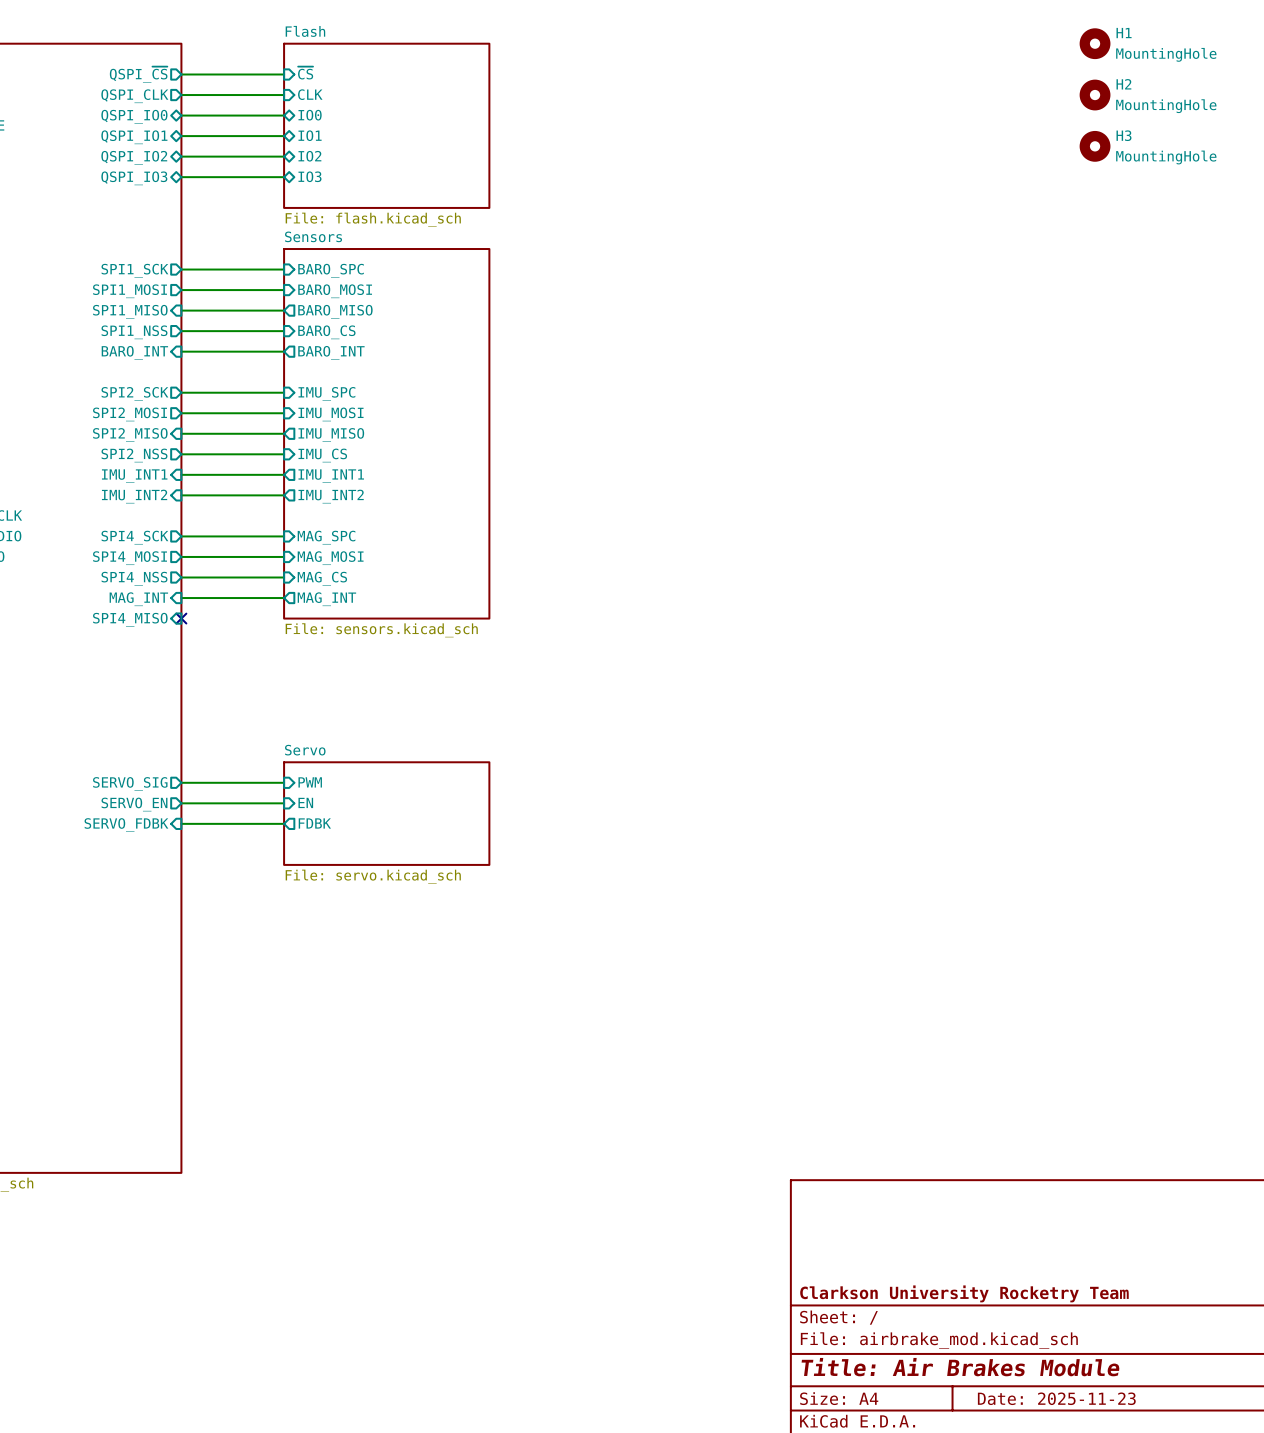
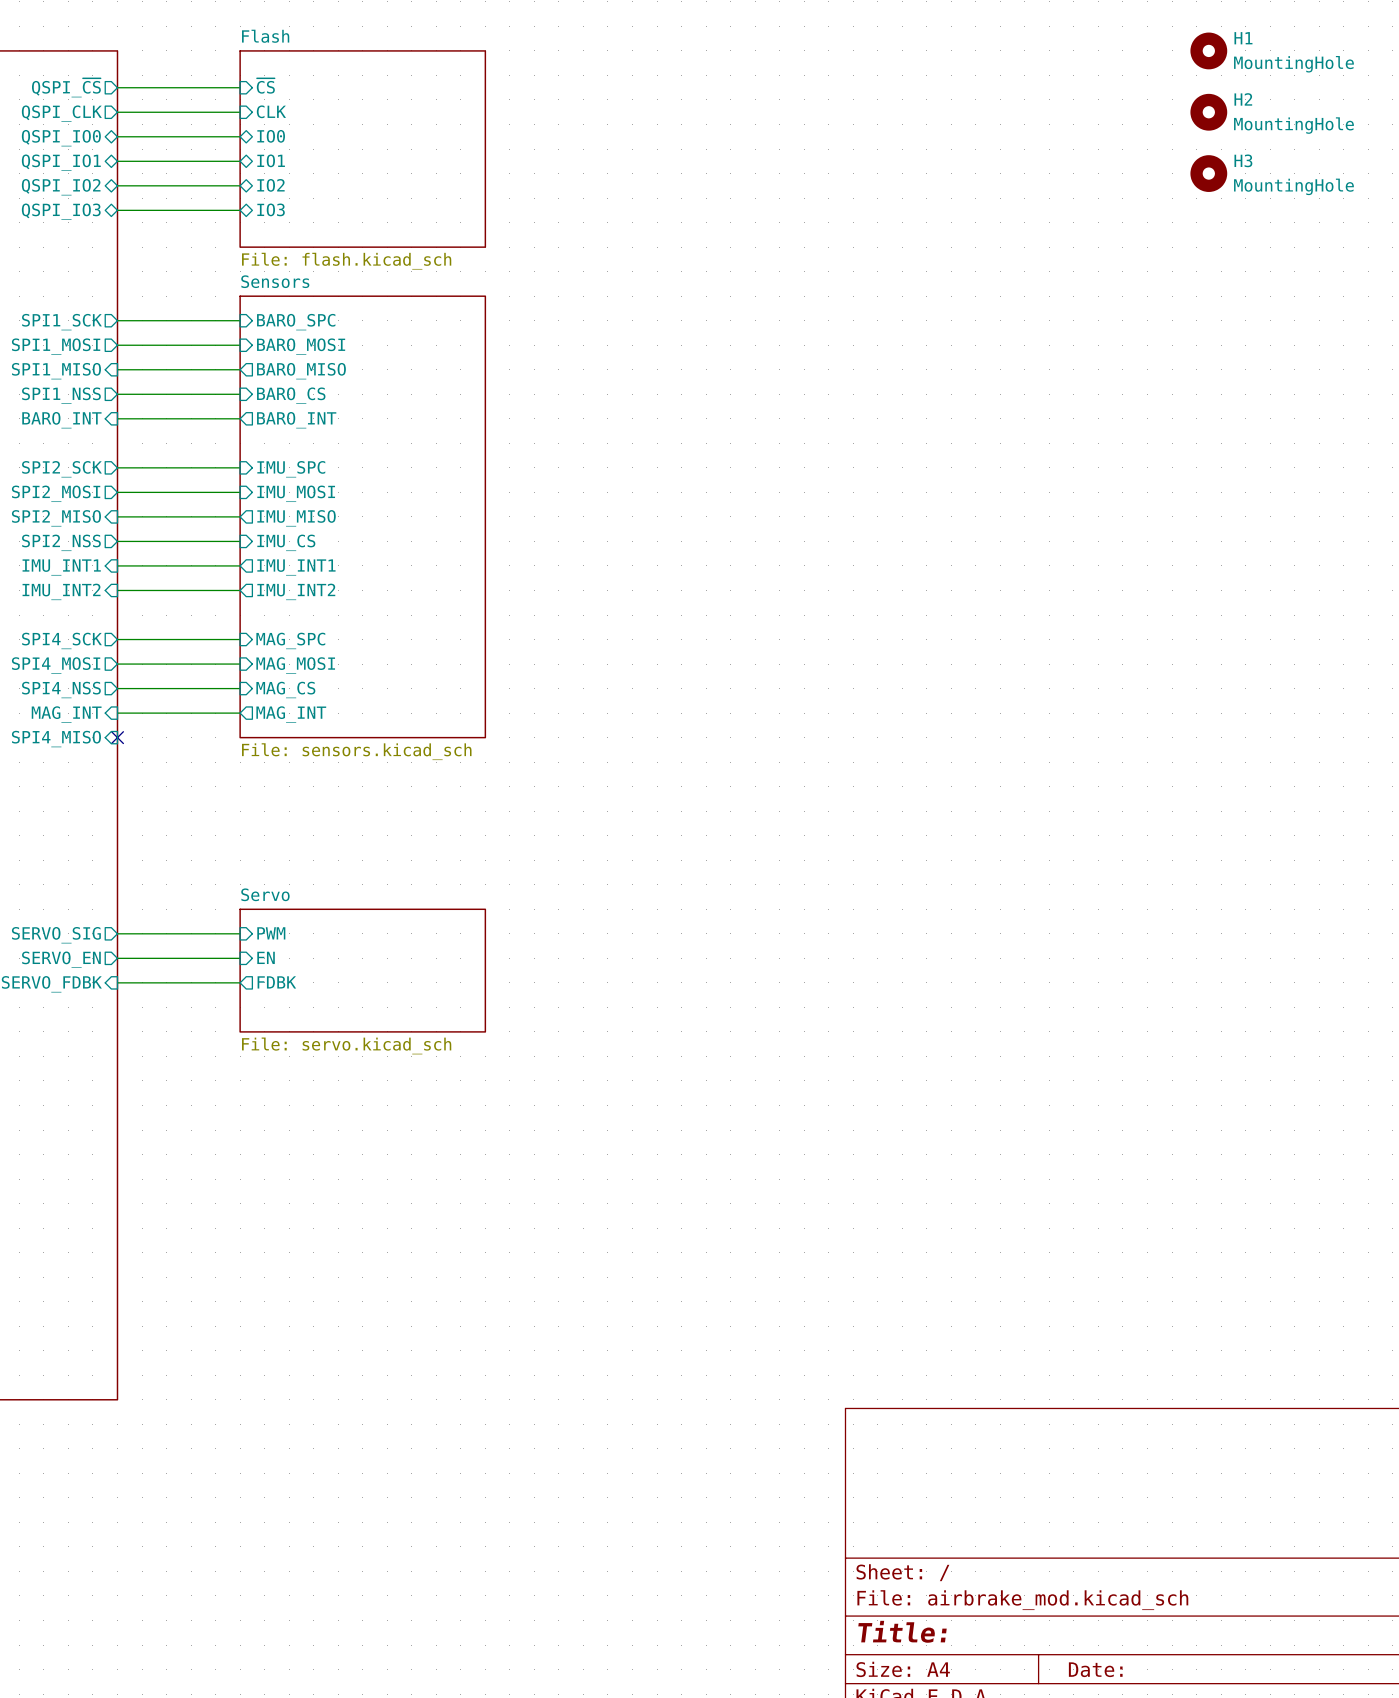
title block: Clarkson University Rocketry Team (964, 1293) -> none
title block: Title: Air Brakes Module (960, 1367) -> Title: (902, 1631)
title block: Date: 2025-11-23 (1056, 1398) -> Date: (1095, 1669)

